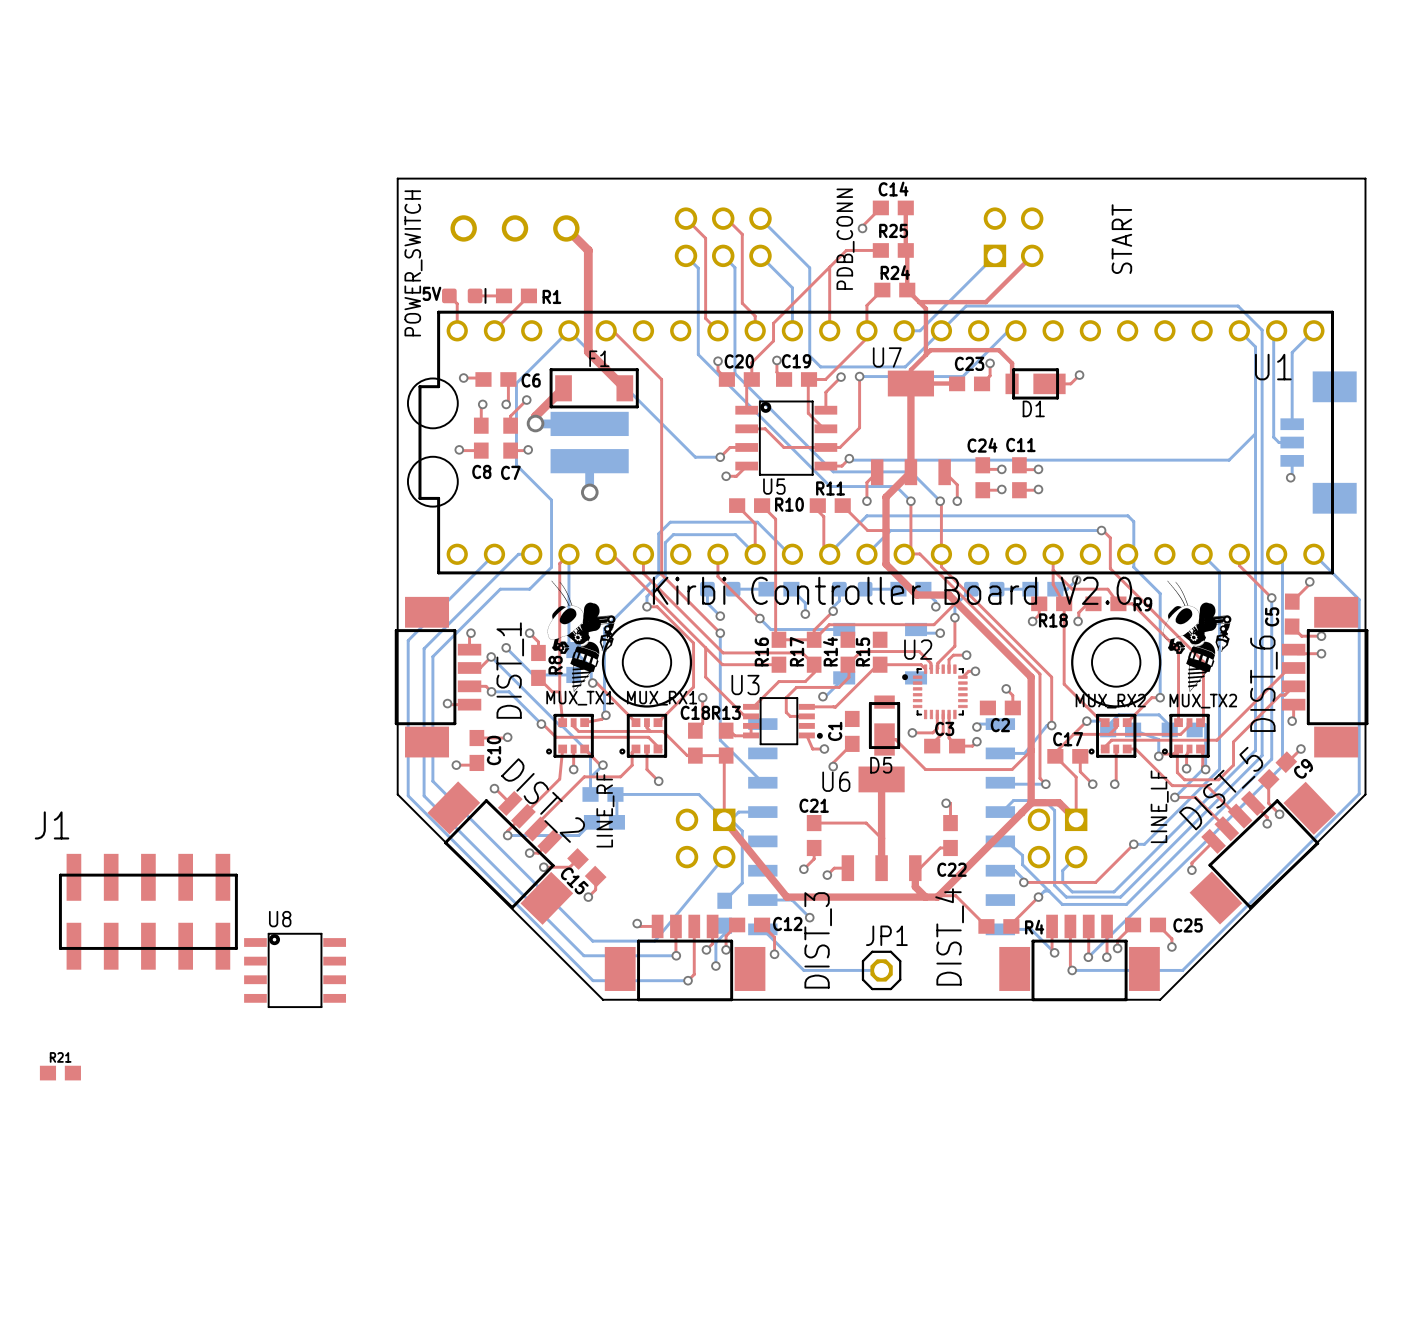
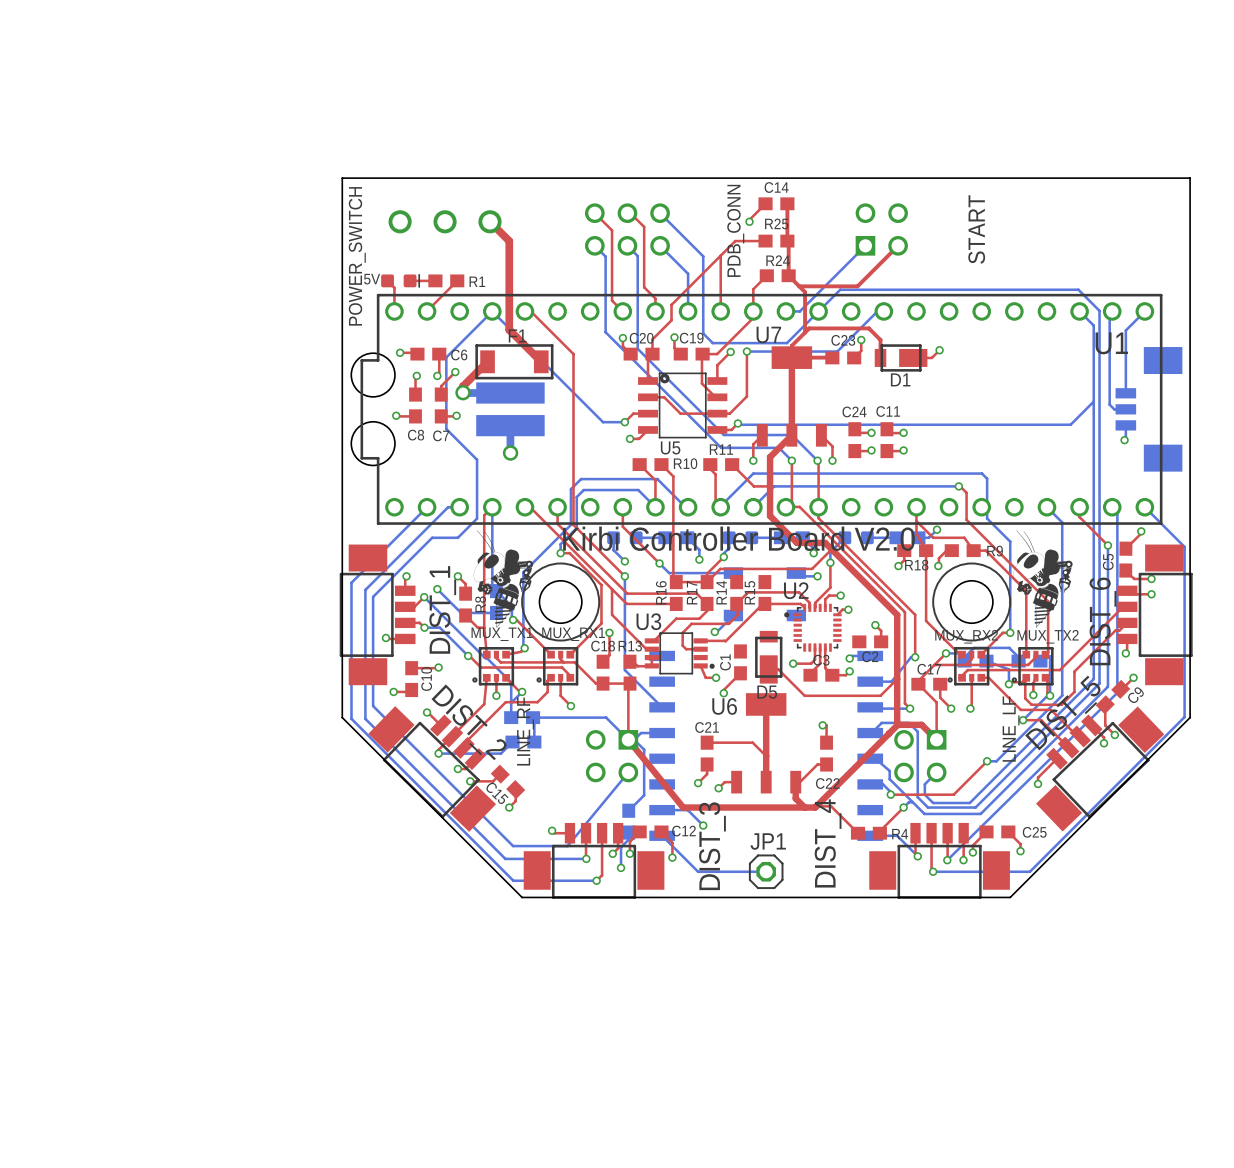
J1: (148, 911) -> none
U8: (295, 970) -> none
R21: (60, 1073) -> none

